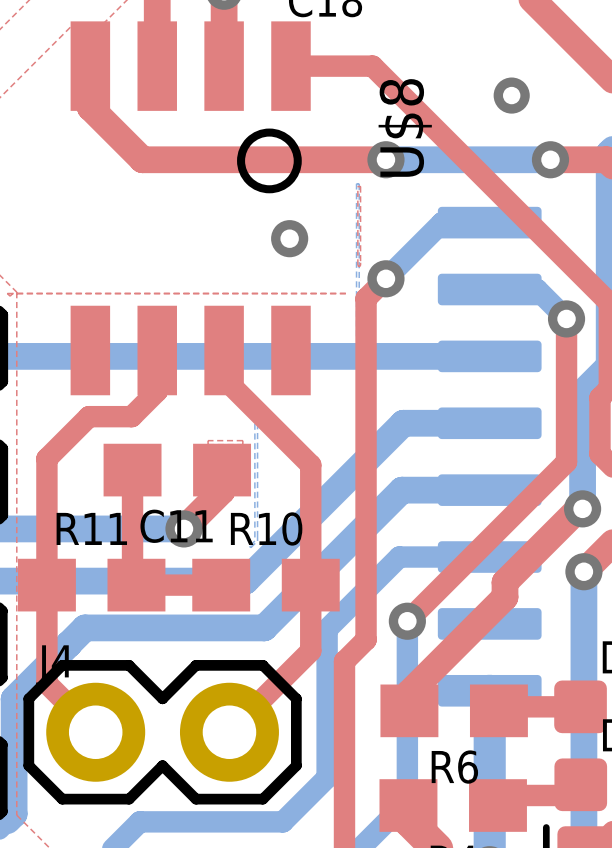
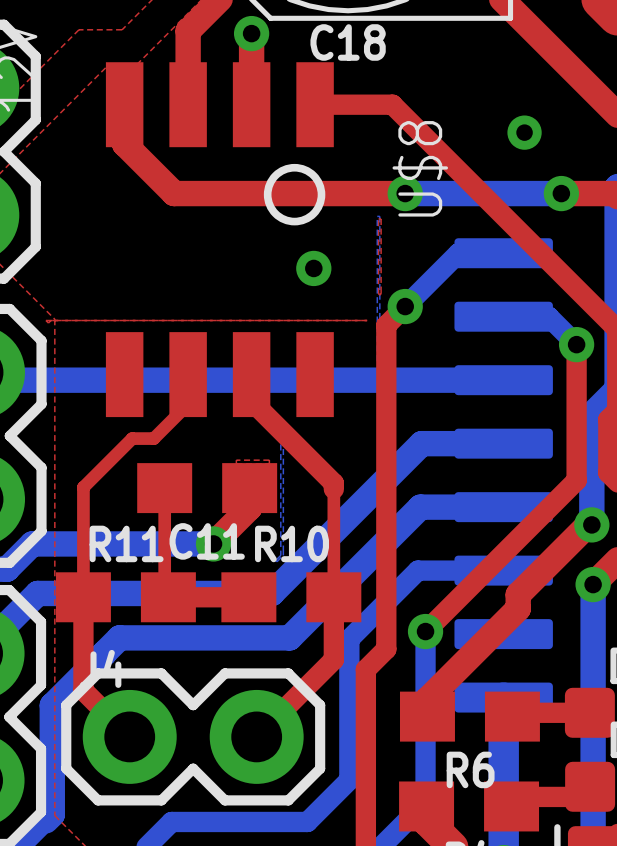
top track: (157, 350) (157, 391) (131, 416) (89, 416) (46, 458) (46, 469) -> (188, 404) (153, 438) (132, 438) (83, 487)
top track width: thick (46, 469) (46, 585) -> thin (83, 487) (83, 597)
top track width: thick (132, 470) (132, 581) -> thin (164, 488) (164, 593)
top track width: thick (310, 471) (310, 585) -> thin (333, 489) (333, 597)

